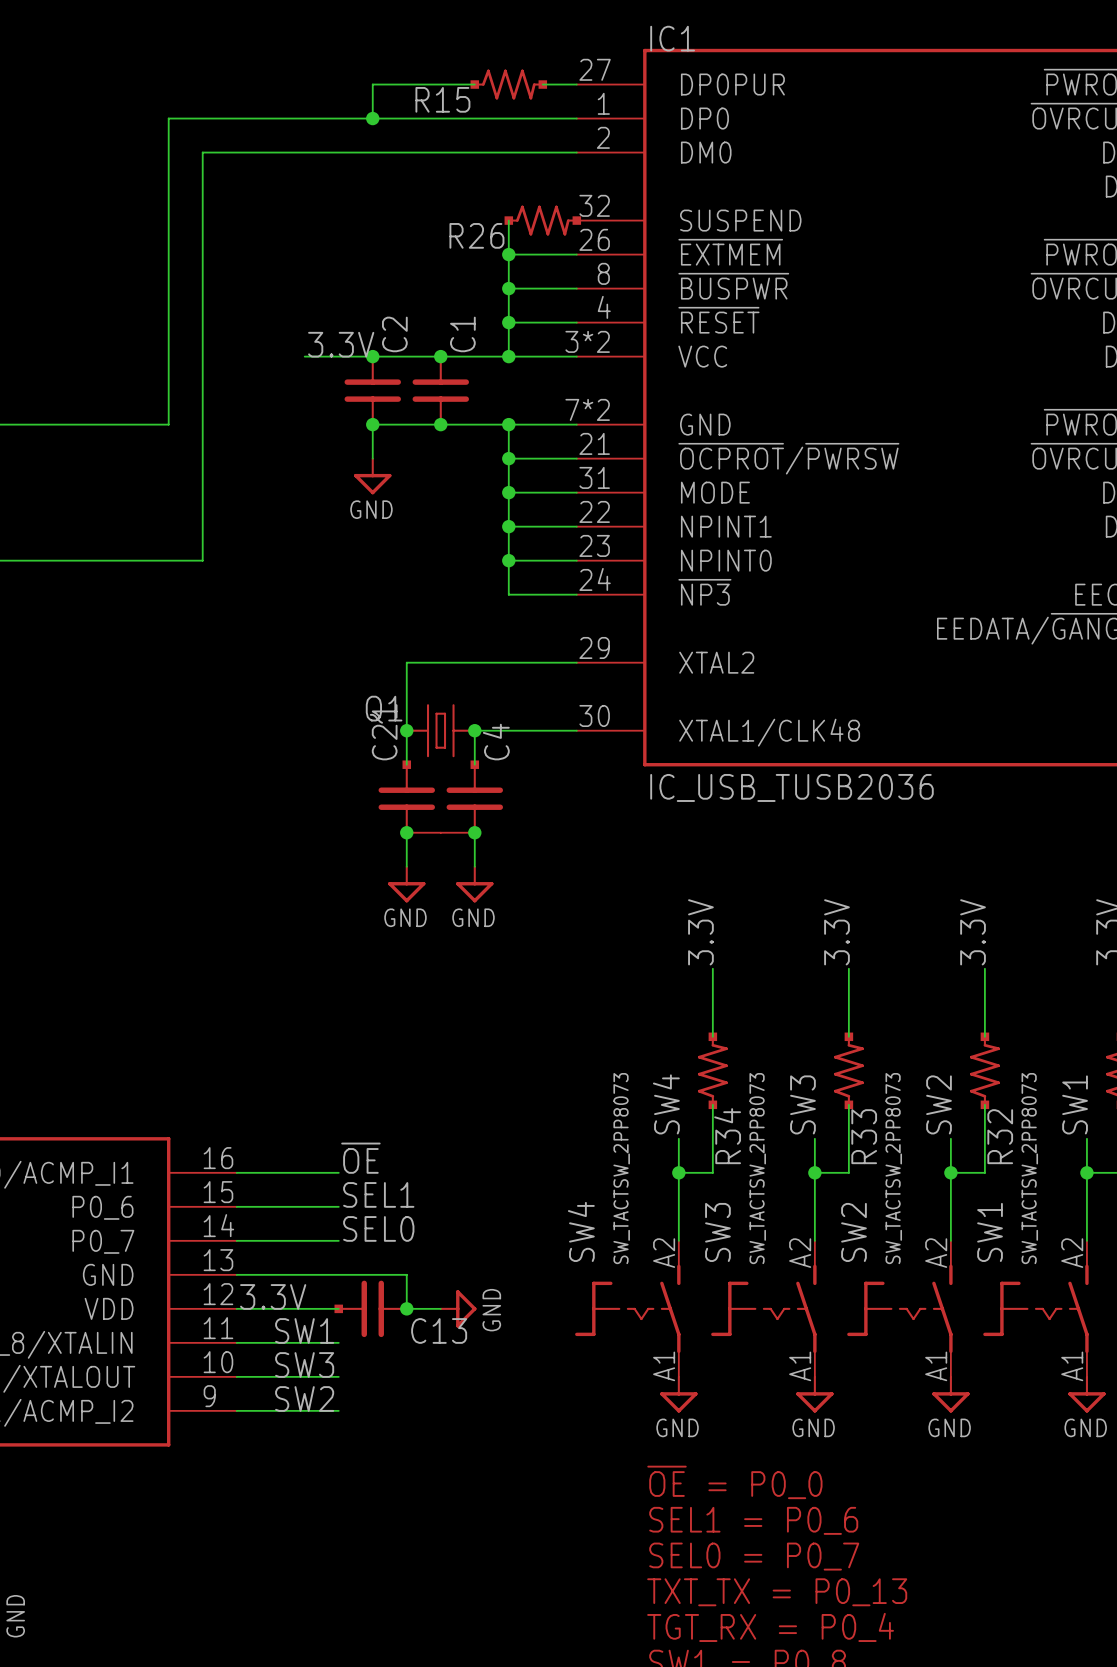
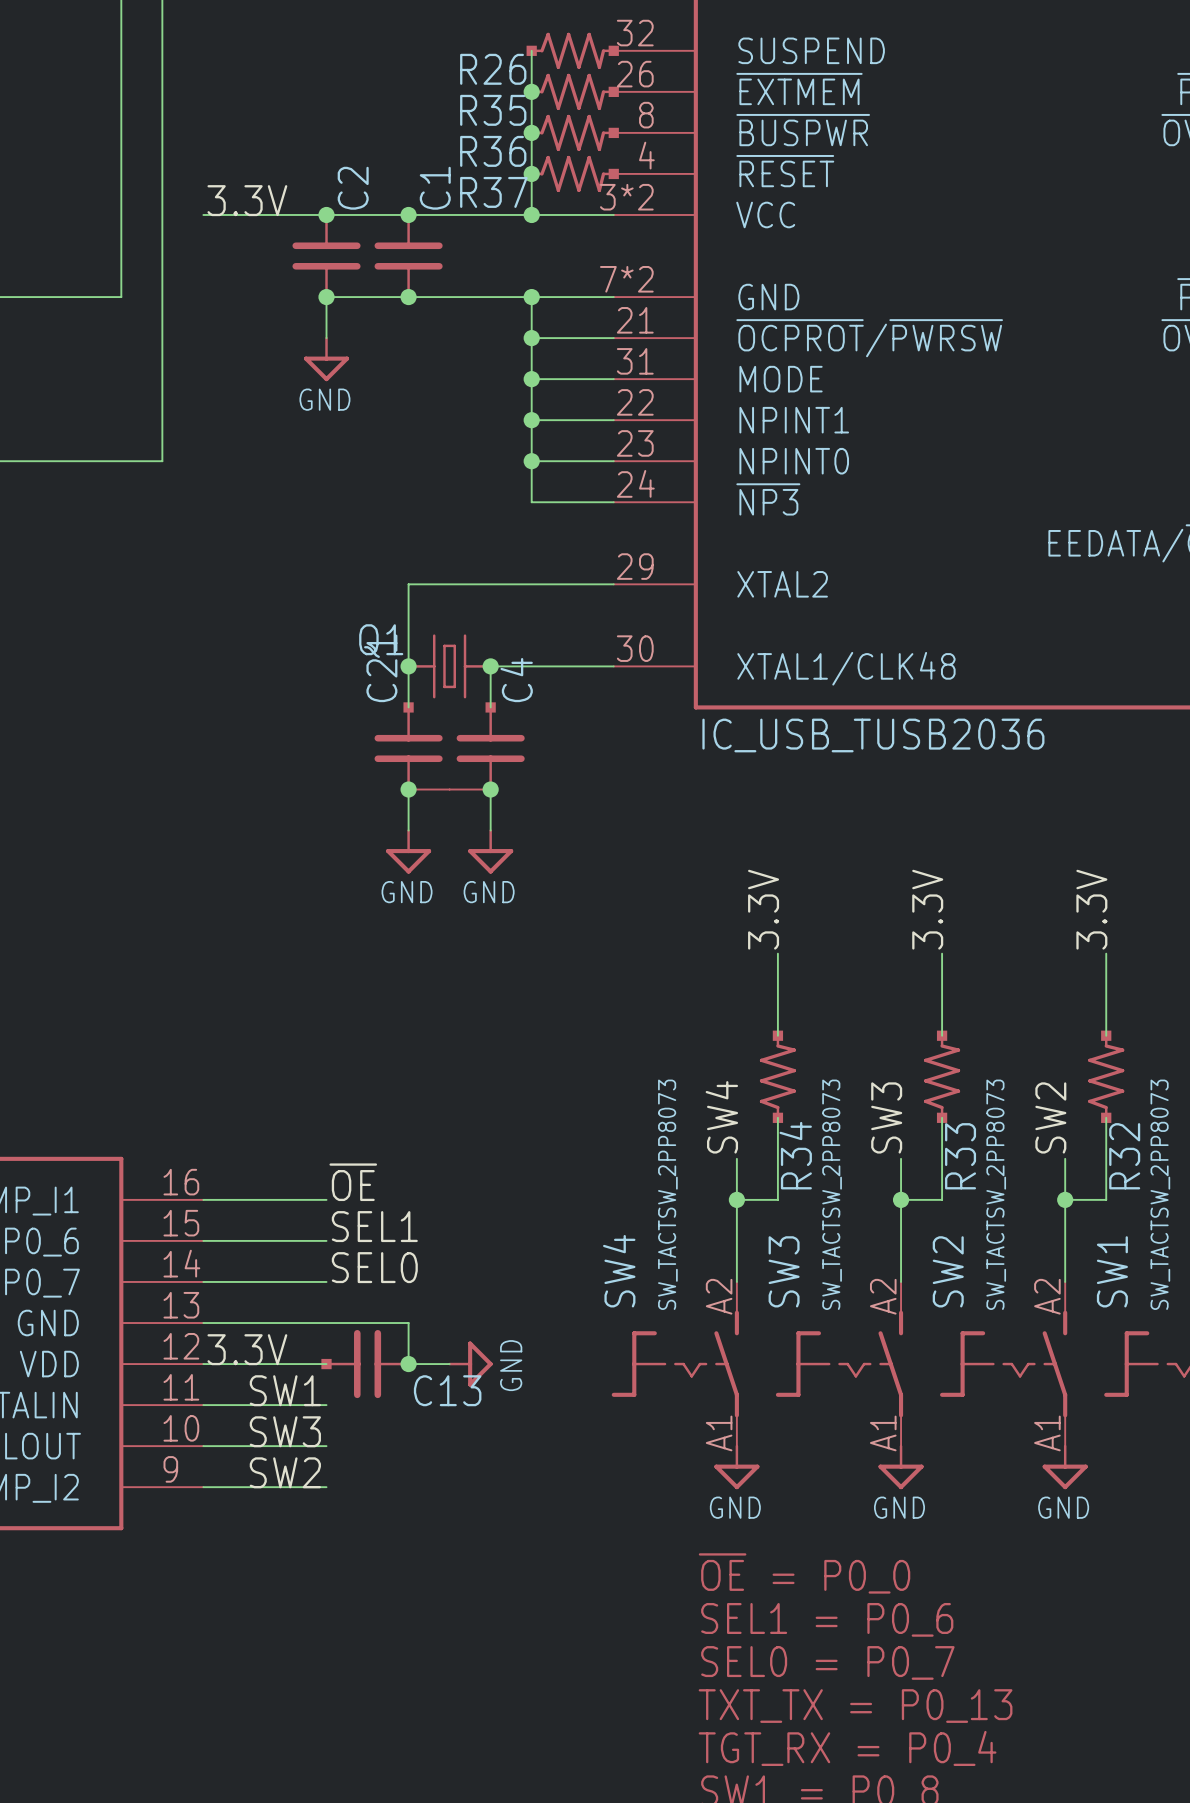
wire: (508, 254) (576, 254) -> none
R35: none -> (572, 91)
wire: (508, 288) (576, 288) -> none
R36: none -> (572, 132)
wire: (508, 322) (576, 322) -> (203, 214) (285, 214)
R37: none -> (572, 173)
label position: 3.3V (341, 344) -> 3.3V (247, 200)
junction: none -> (326, 214)
junction: (372, 356) -> none
junction: none -> (408, 214)
junction: (440, 356) -> none
C2 position: (372, 390) -> (326, 256)
C1 position: (440, 390) -> (408, 256)
junction: none -> (326, 297)
wire: (372, 424) (372, 458) -> (367, 297) (326, 297) (326, 338)
junction: (372, 424) -> none
junction: none -> (408, 297)
junction: (440, 424) -> none
power symbol position: GND (372, 475) -> GND (326, 359)

